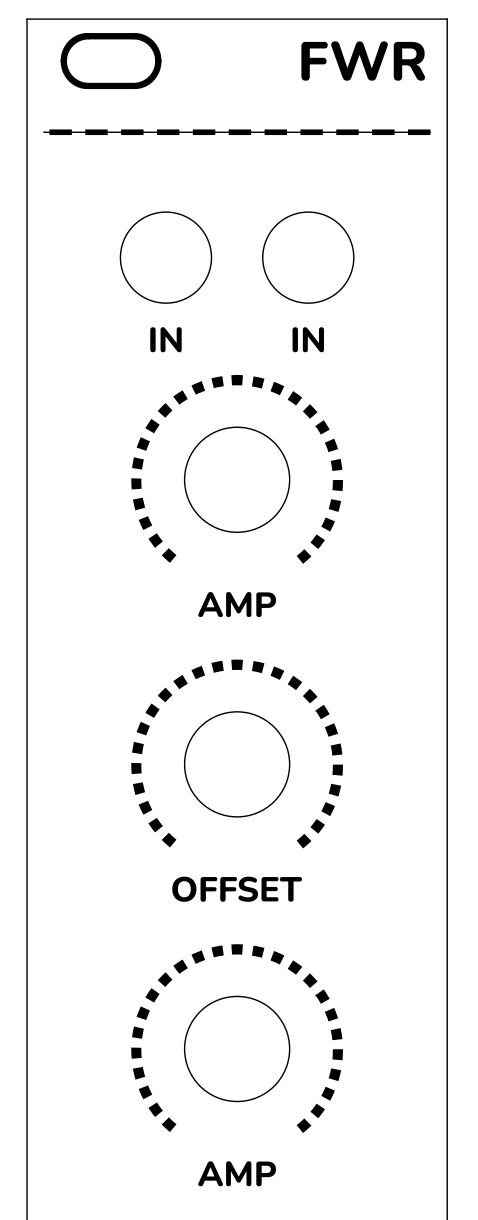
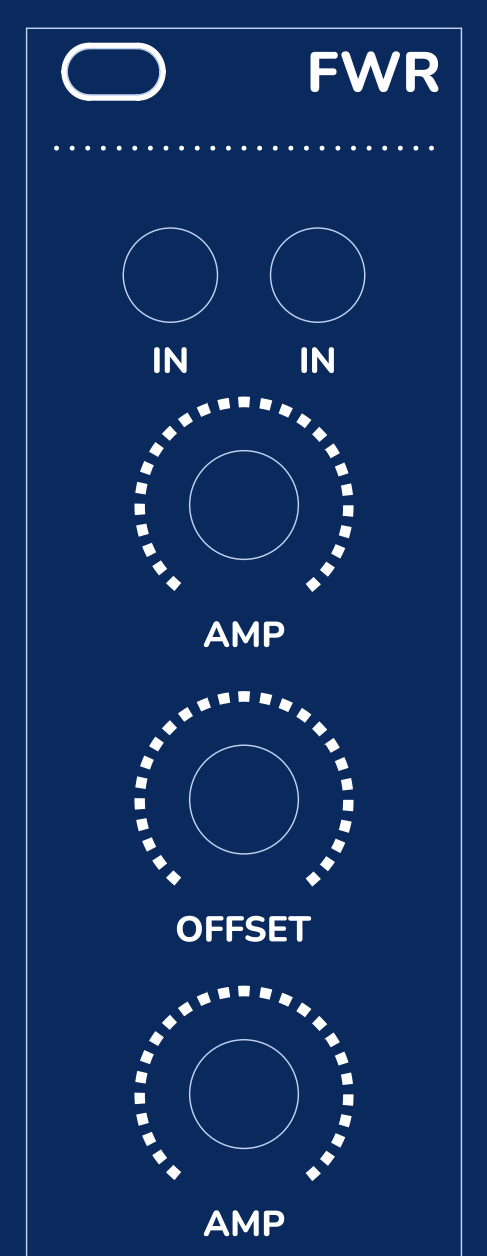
line: (43, 132) (430, 132) (43, 132) -> none
drawing: none -> [54, 145, 434, 151]

